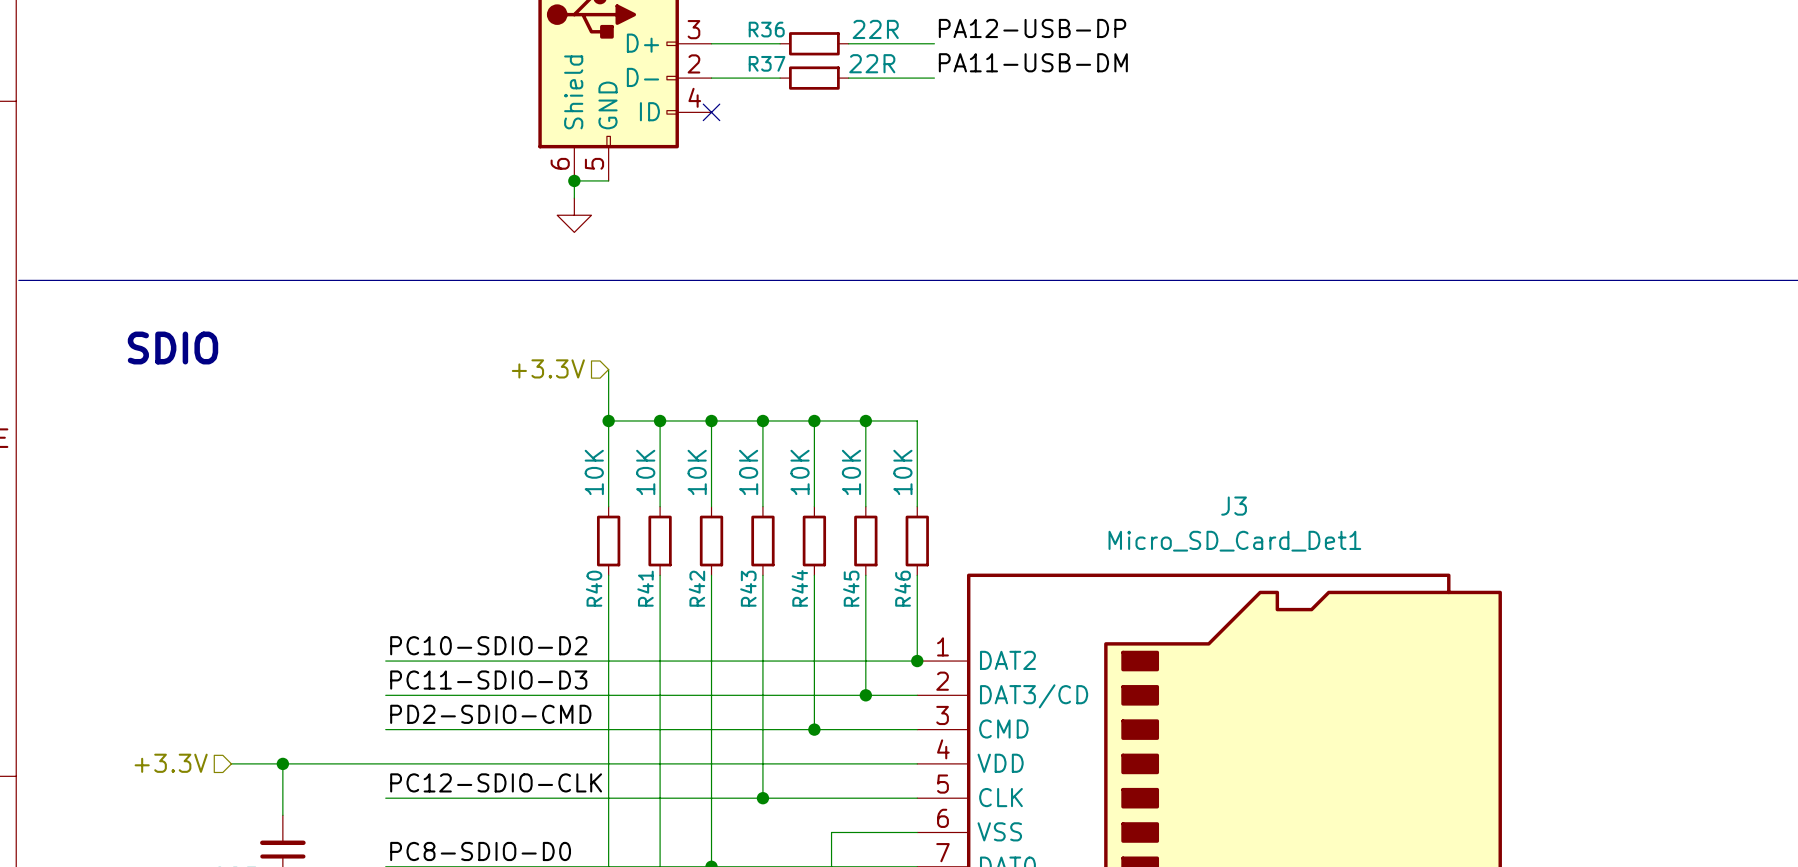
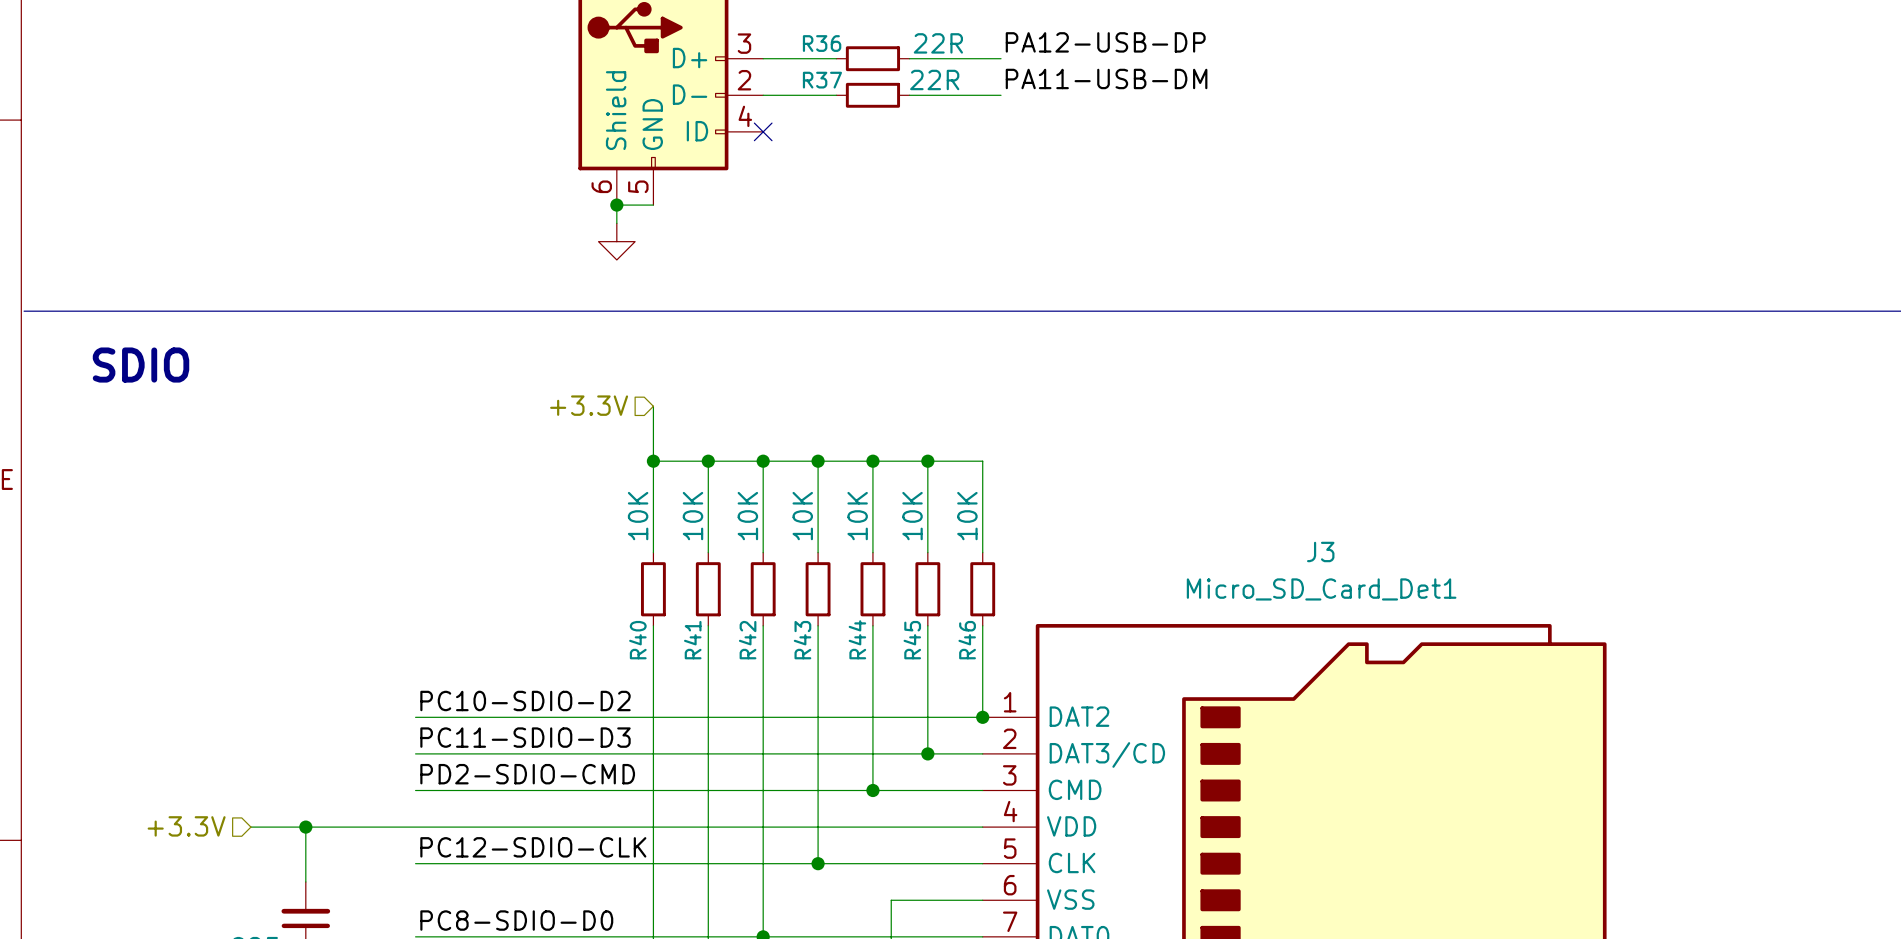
text position: SDIO (172, 348) -> SDIO (141, 365)

